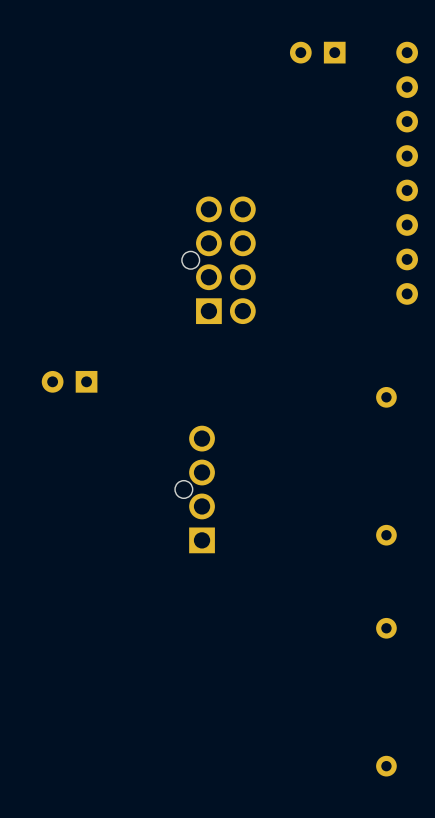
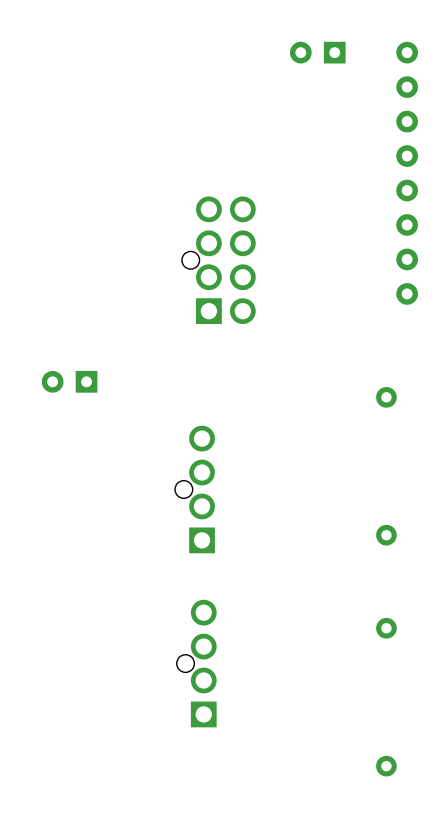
part: none -> (196, 663)

